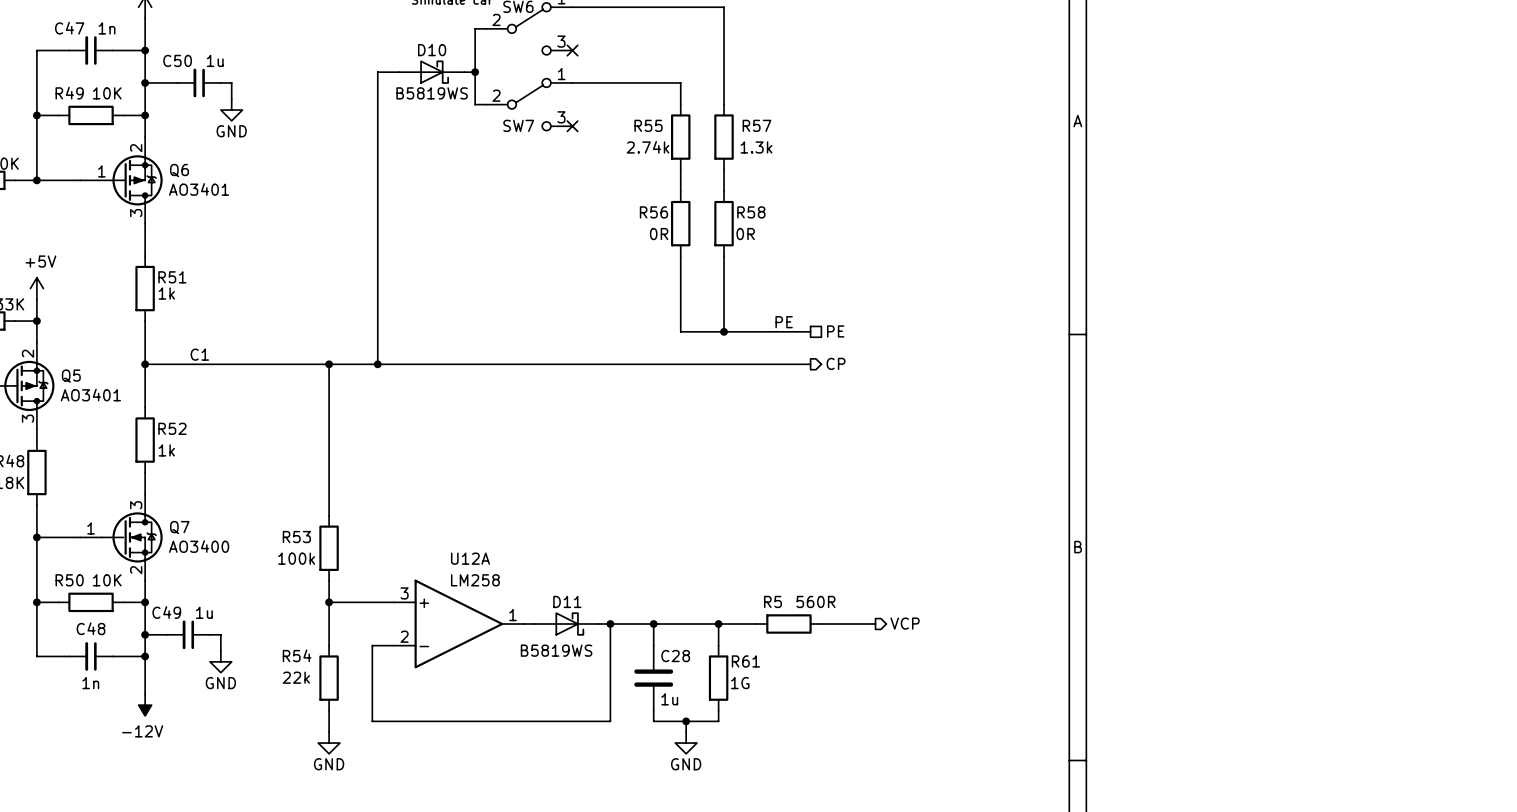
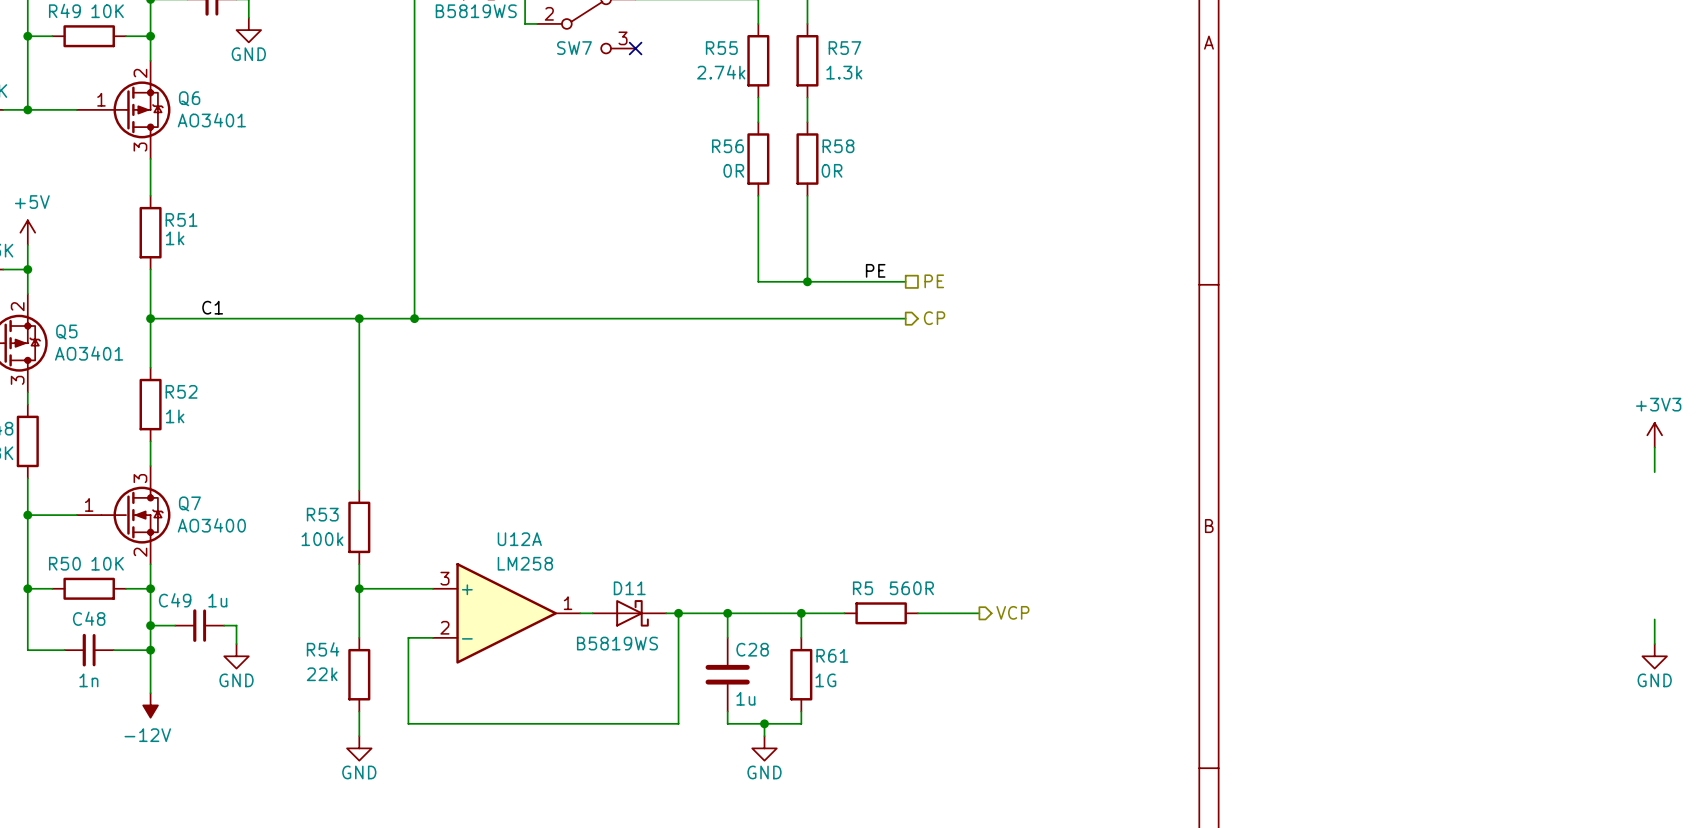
power symbol: none -> +3V3 (1654, 435)
wire: none -> (1654, 447) (1654, 472)
wire: none -> (1654, 619) (1654, 644)
power symbol: none -> GND (1654, 656)

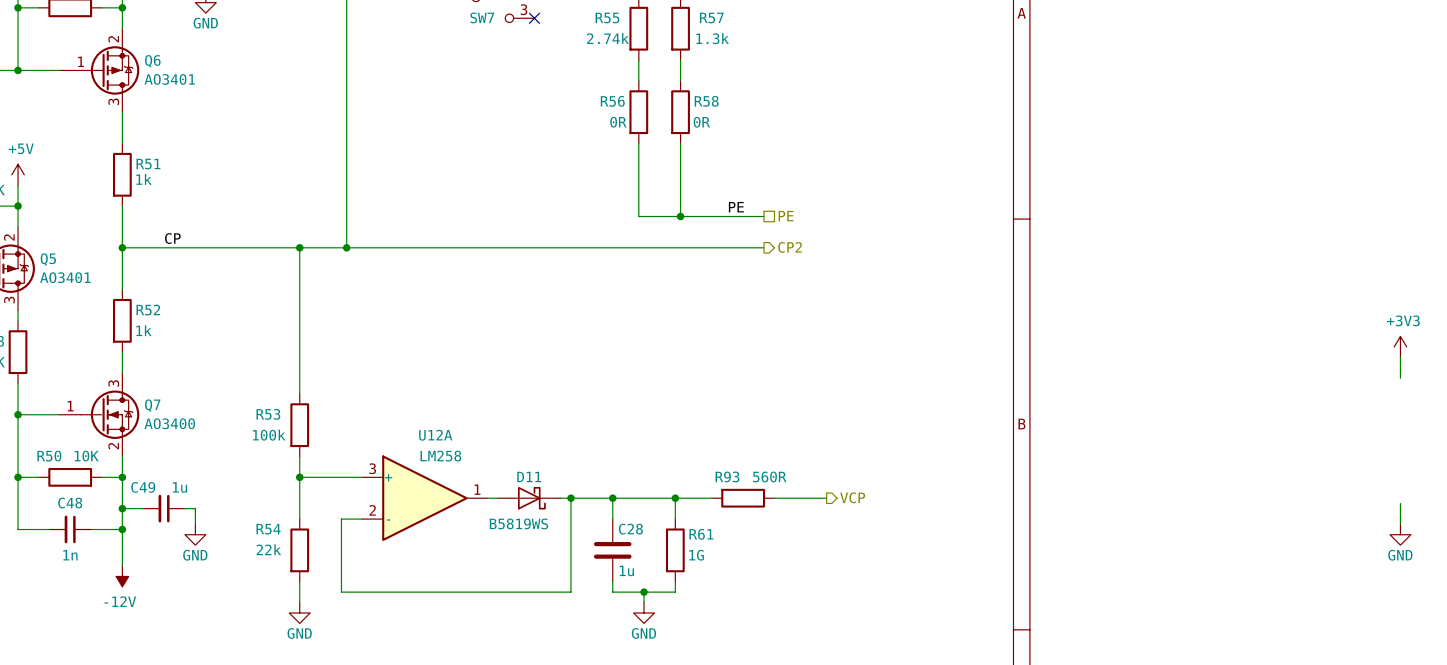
label: C1 (212, 307) -> CP (172, 238)
hierarchical label: CP (934, 318) -> CP2 (790, 247)
R5 name: R5 (863, 588) -> R93 (727, 476)

